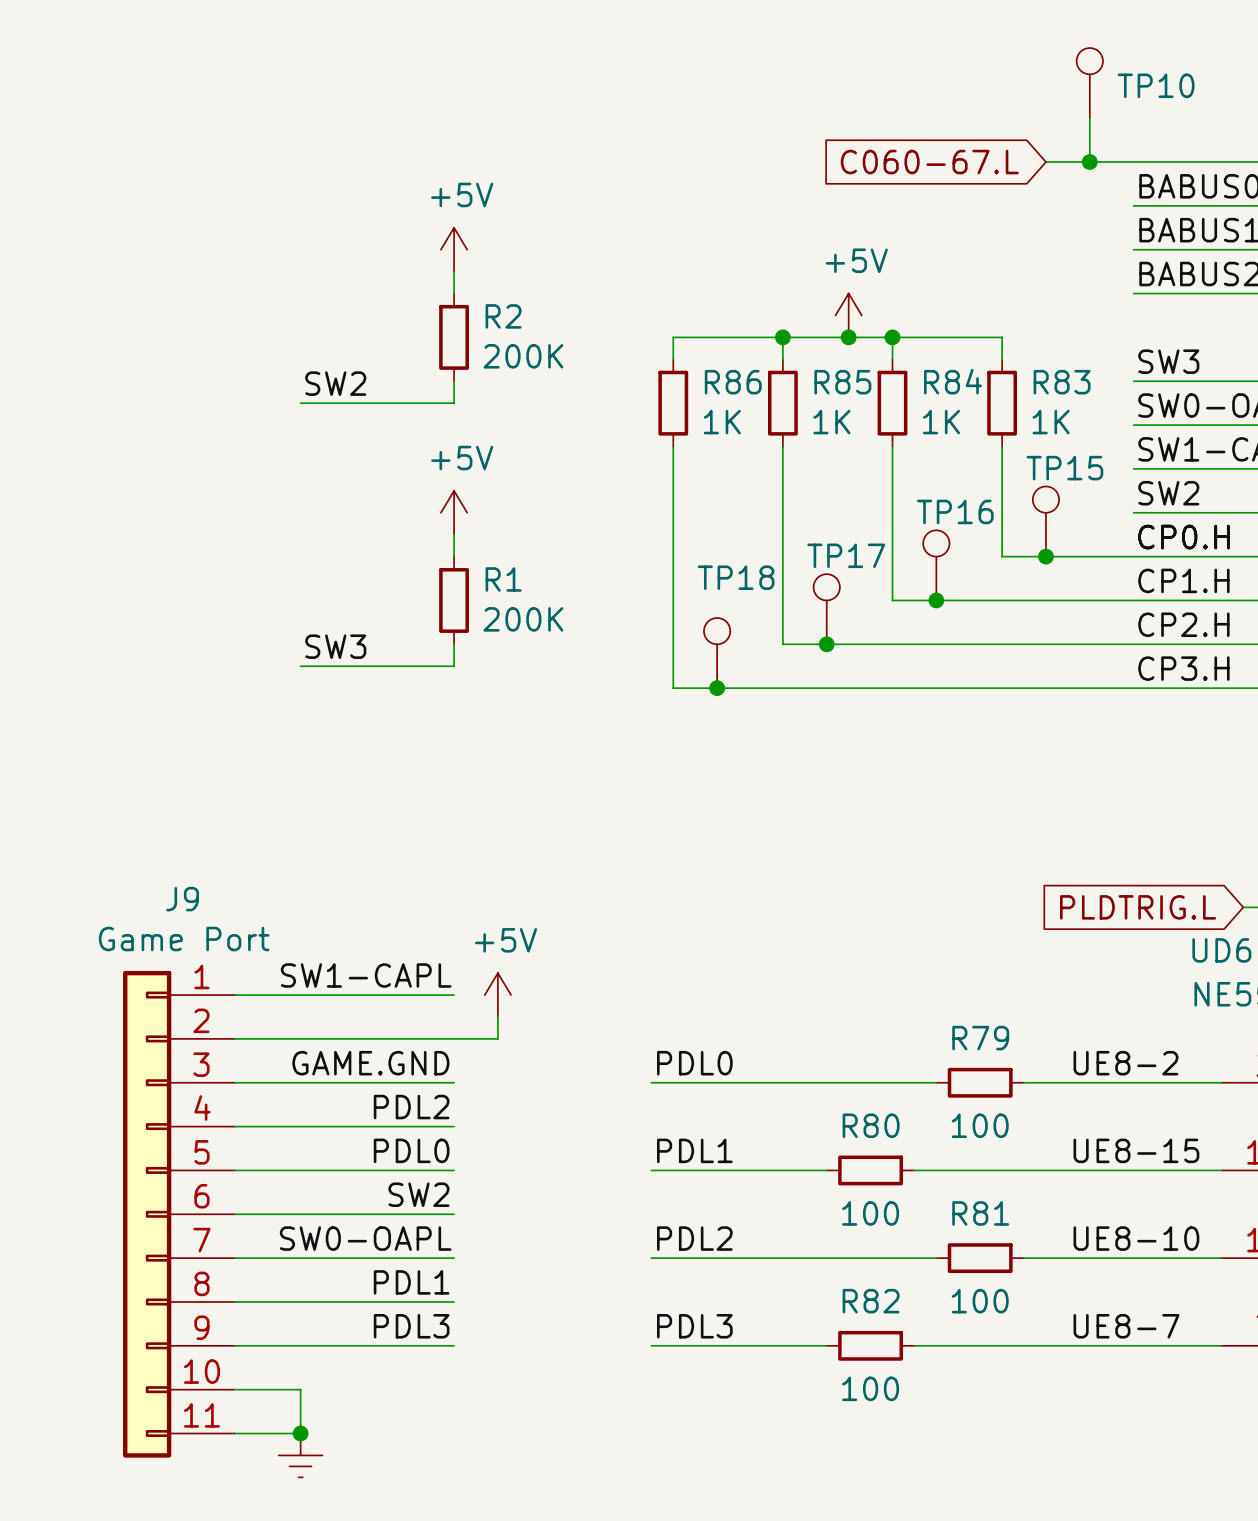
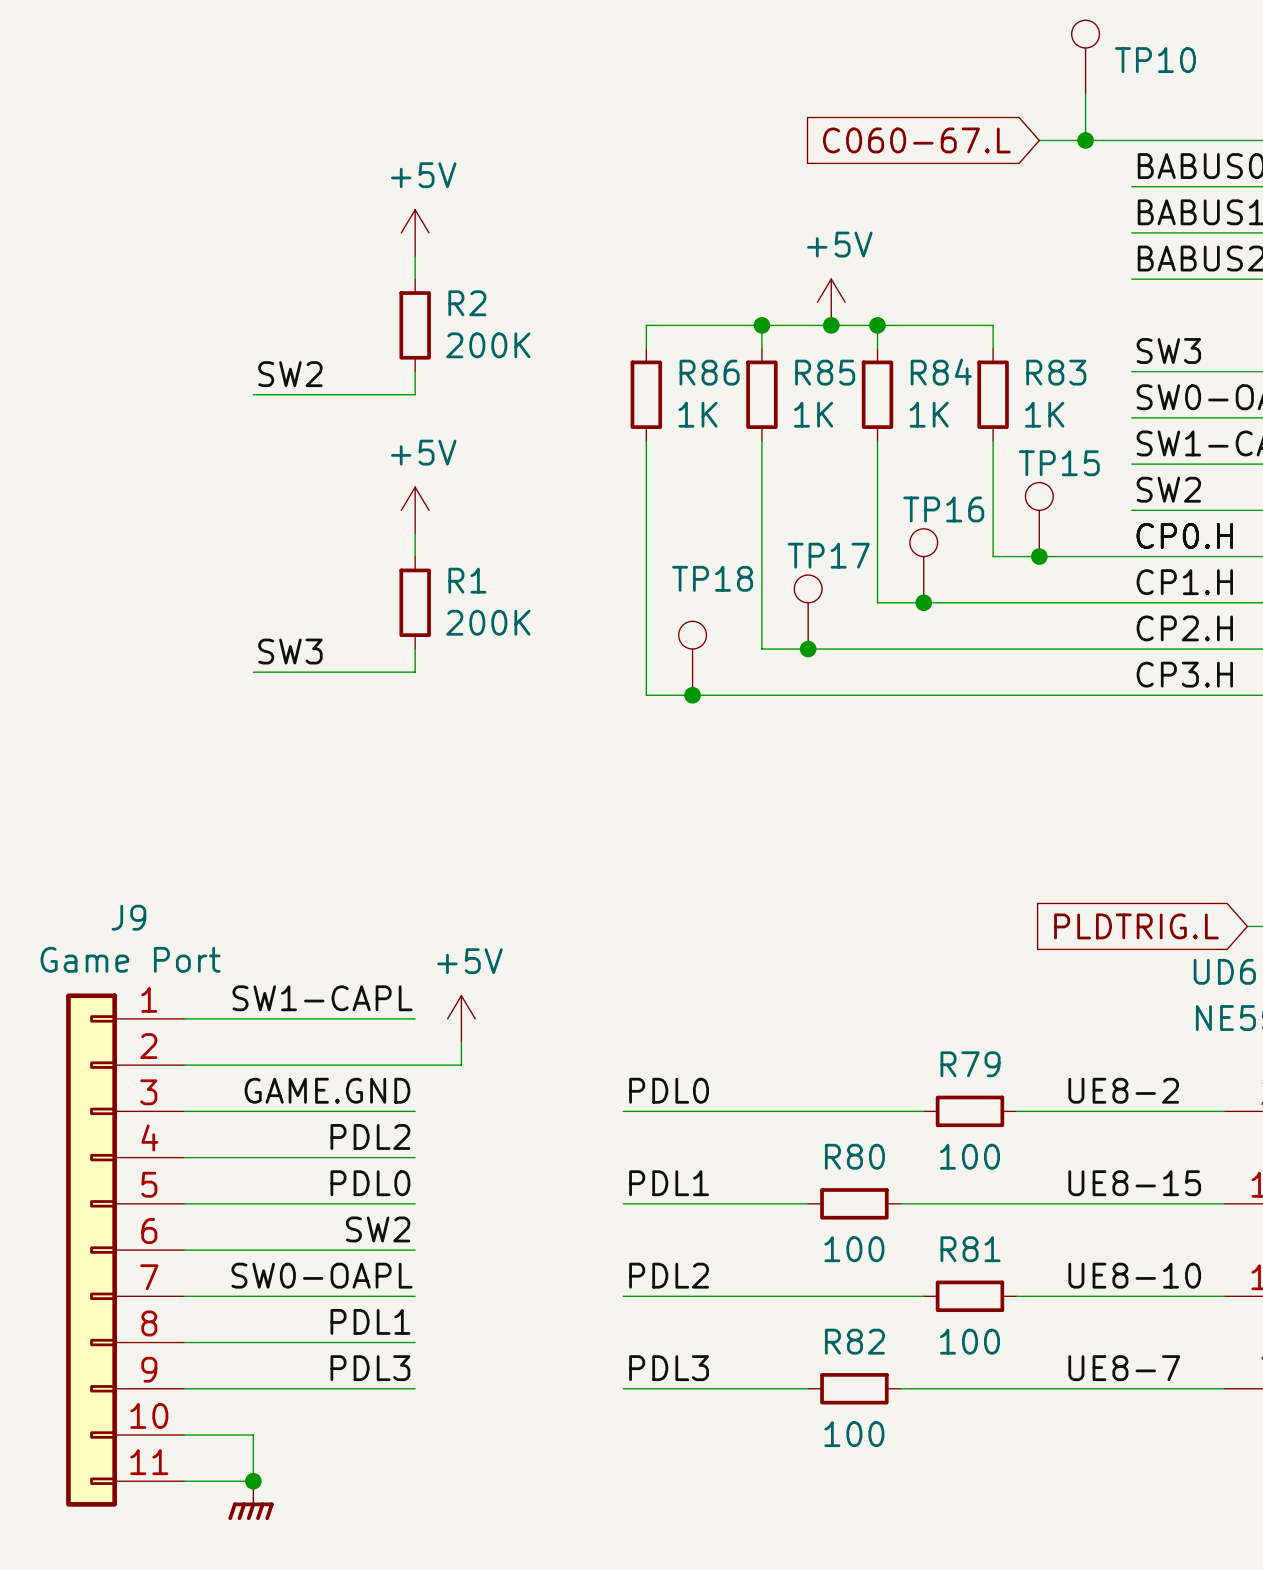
power symbol shape: [278, 1433, 323, 1478] -> [228, 1481, 274, 1521]

